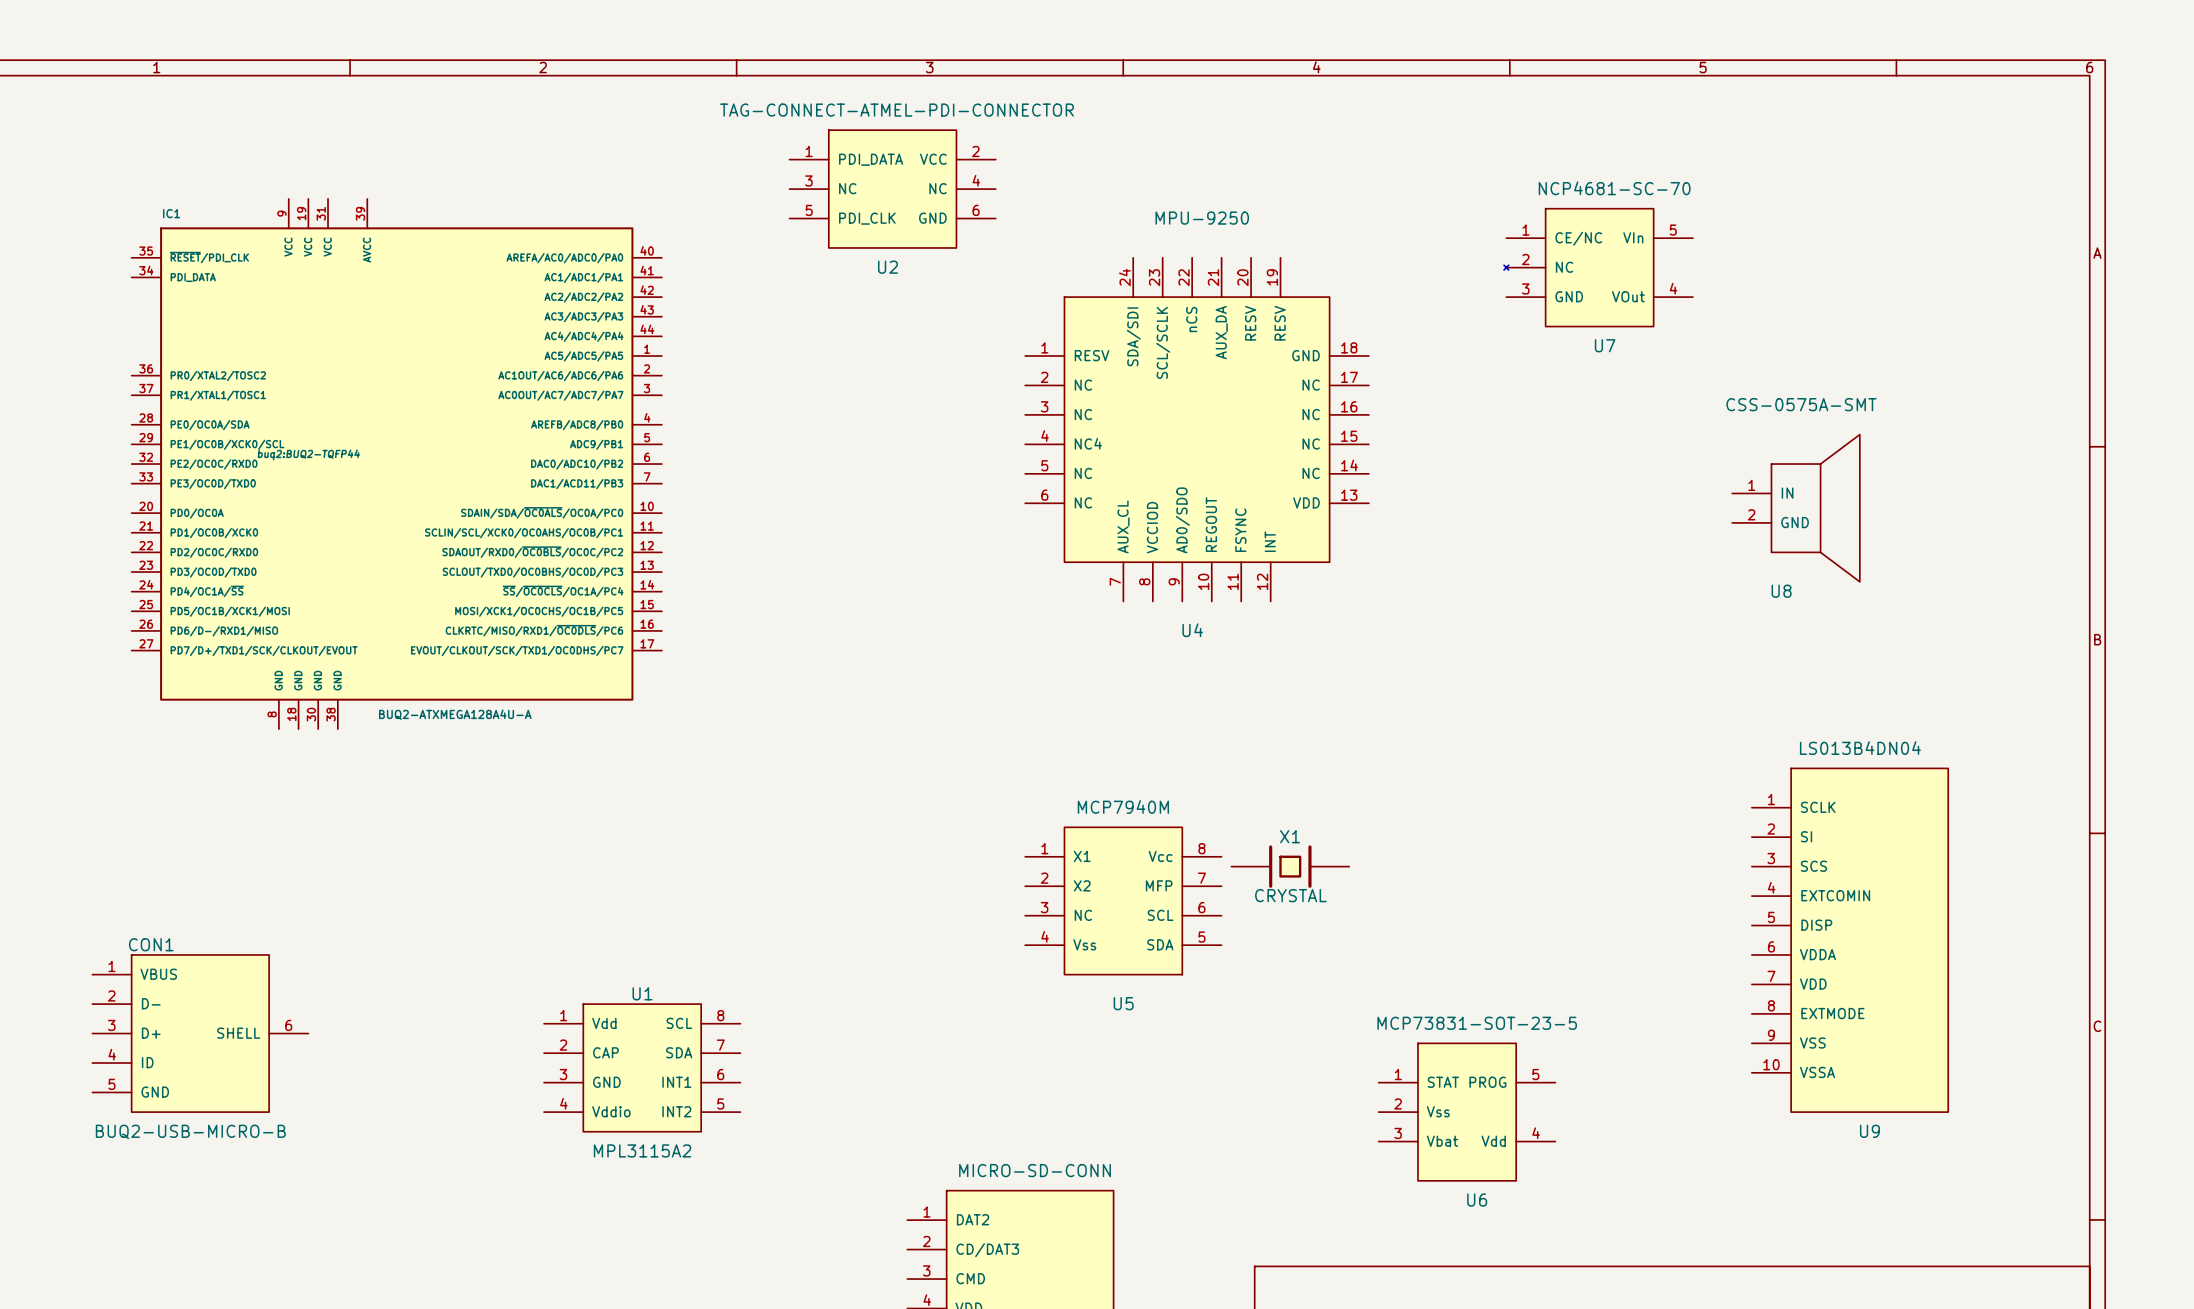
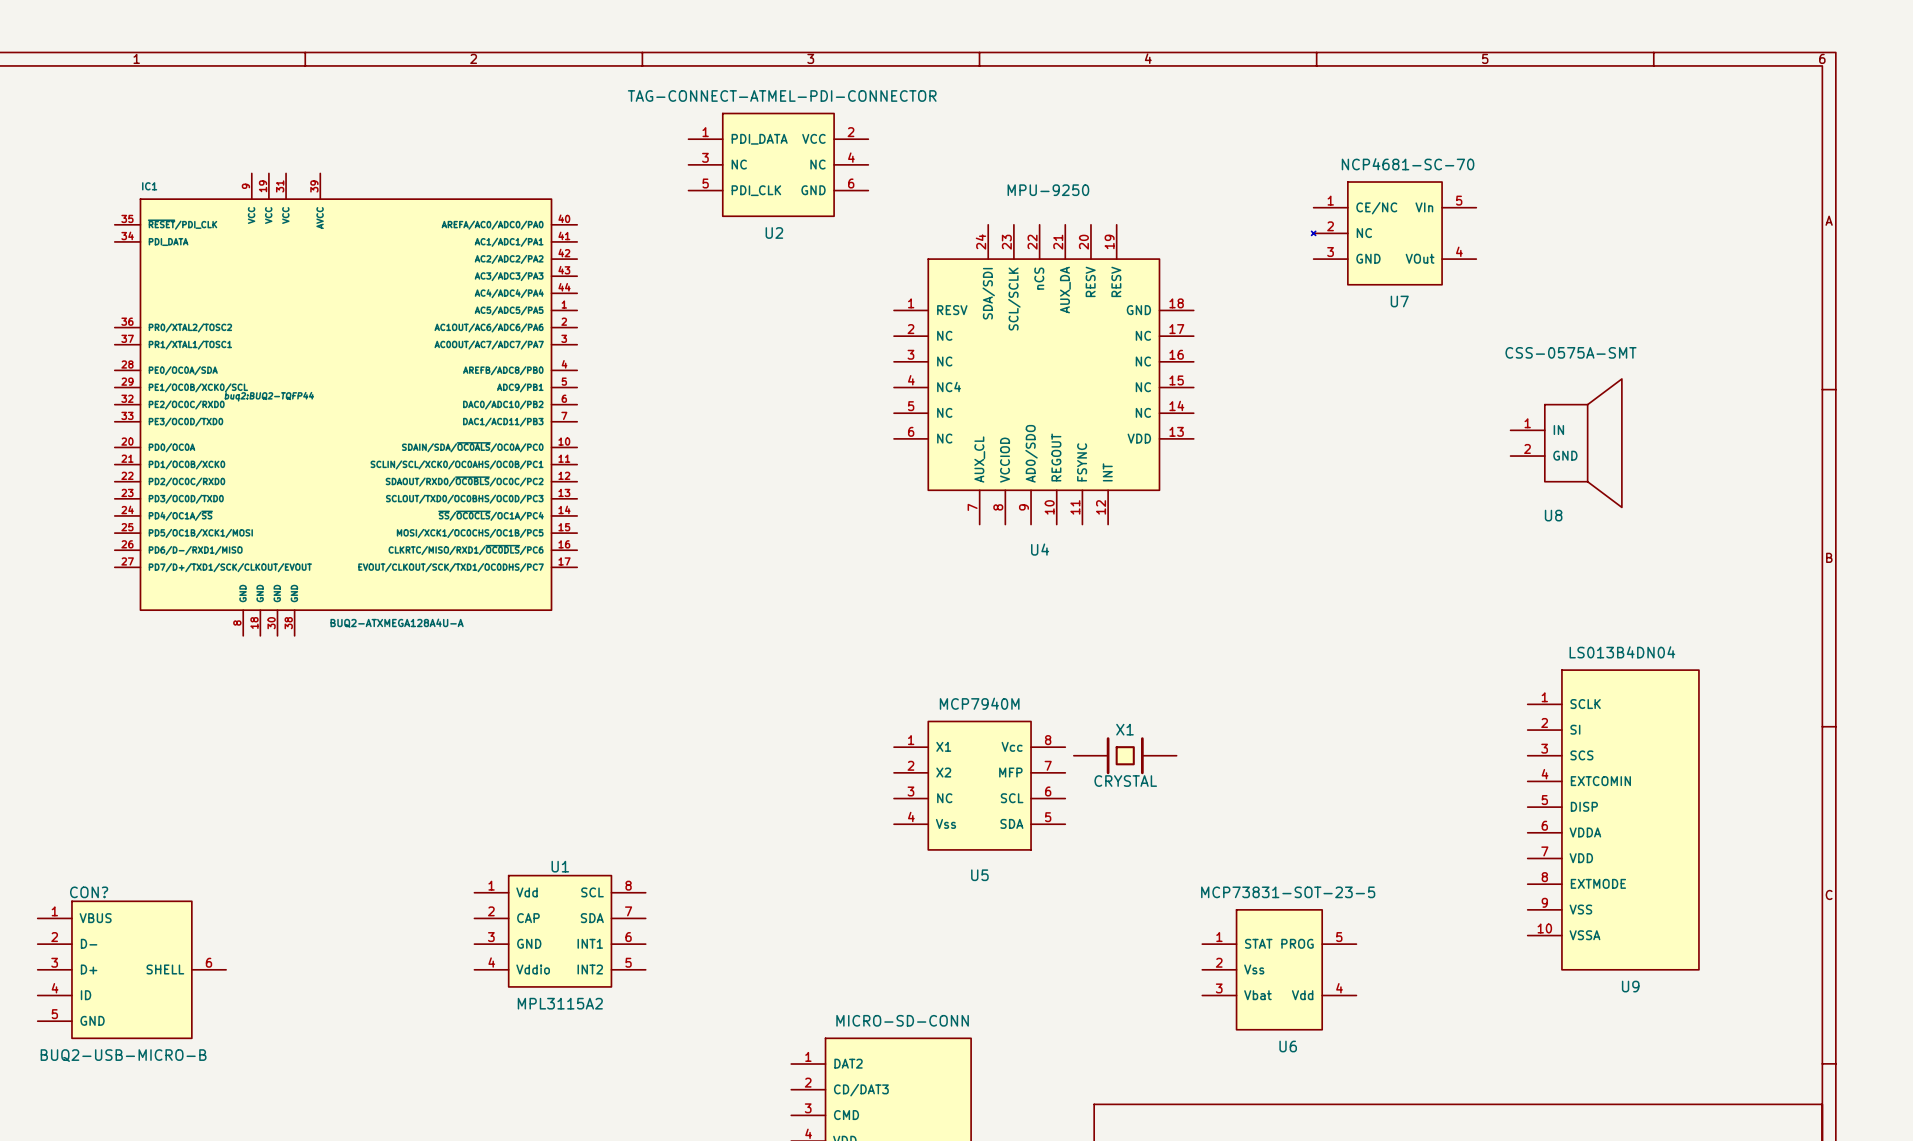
CON1: BUQ2-USB-MICRO-B (200, 1033) -> none
CON?: none -> BUQ2-USB-MICRO-B (131, 969)

